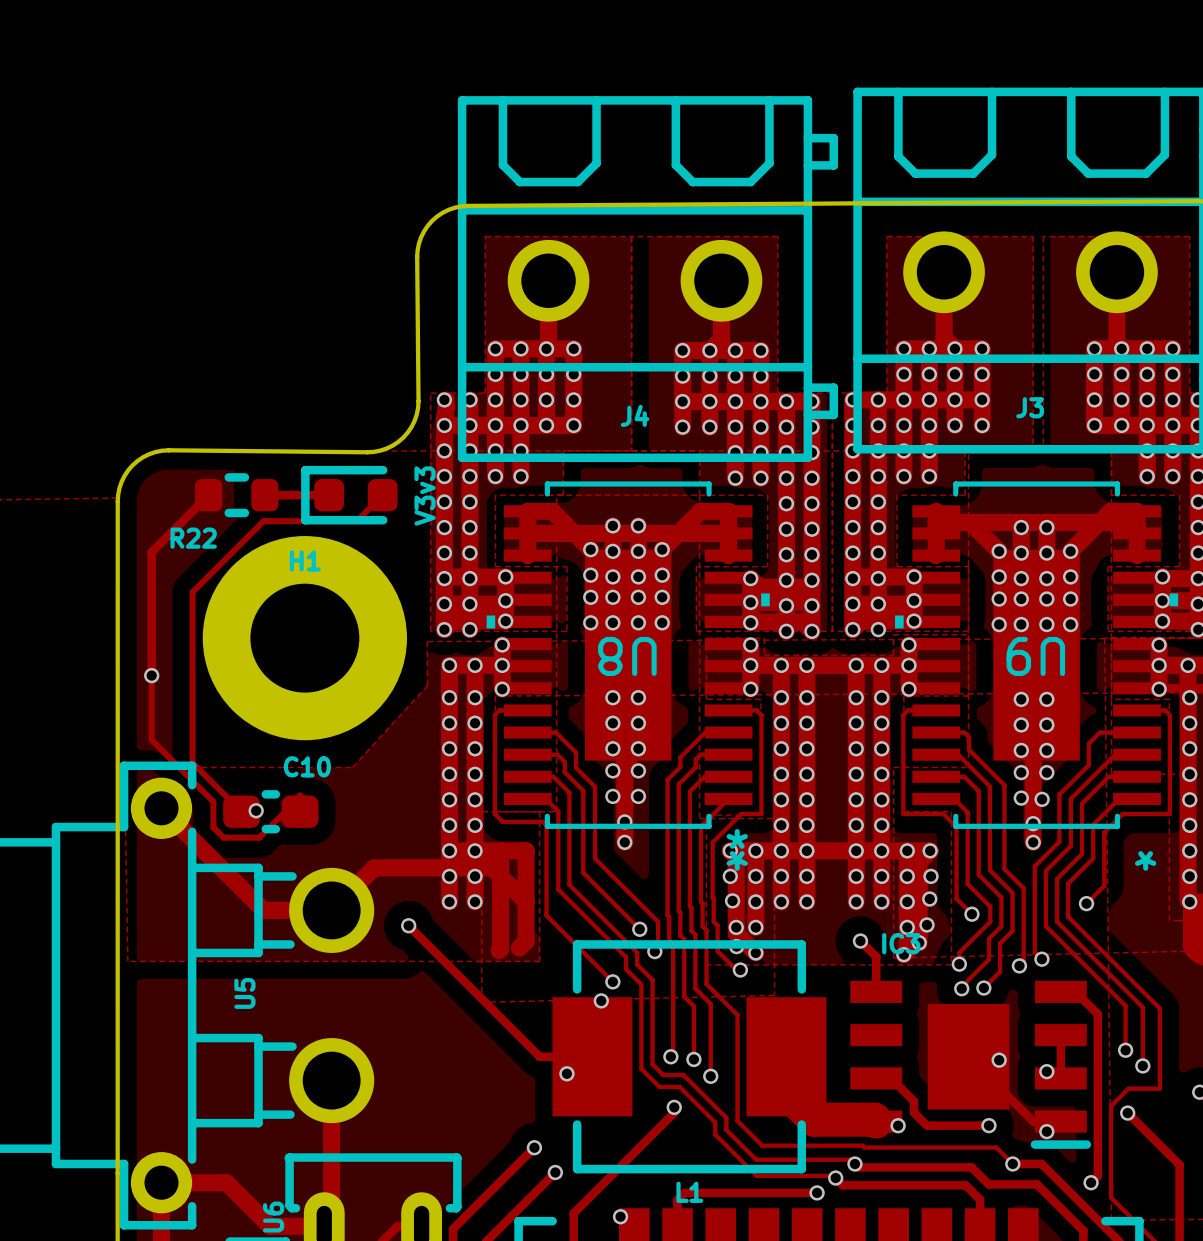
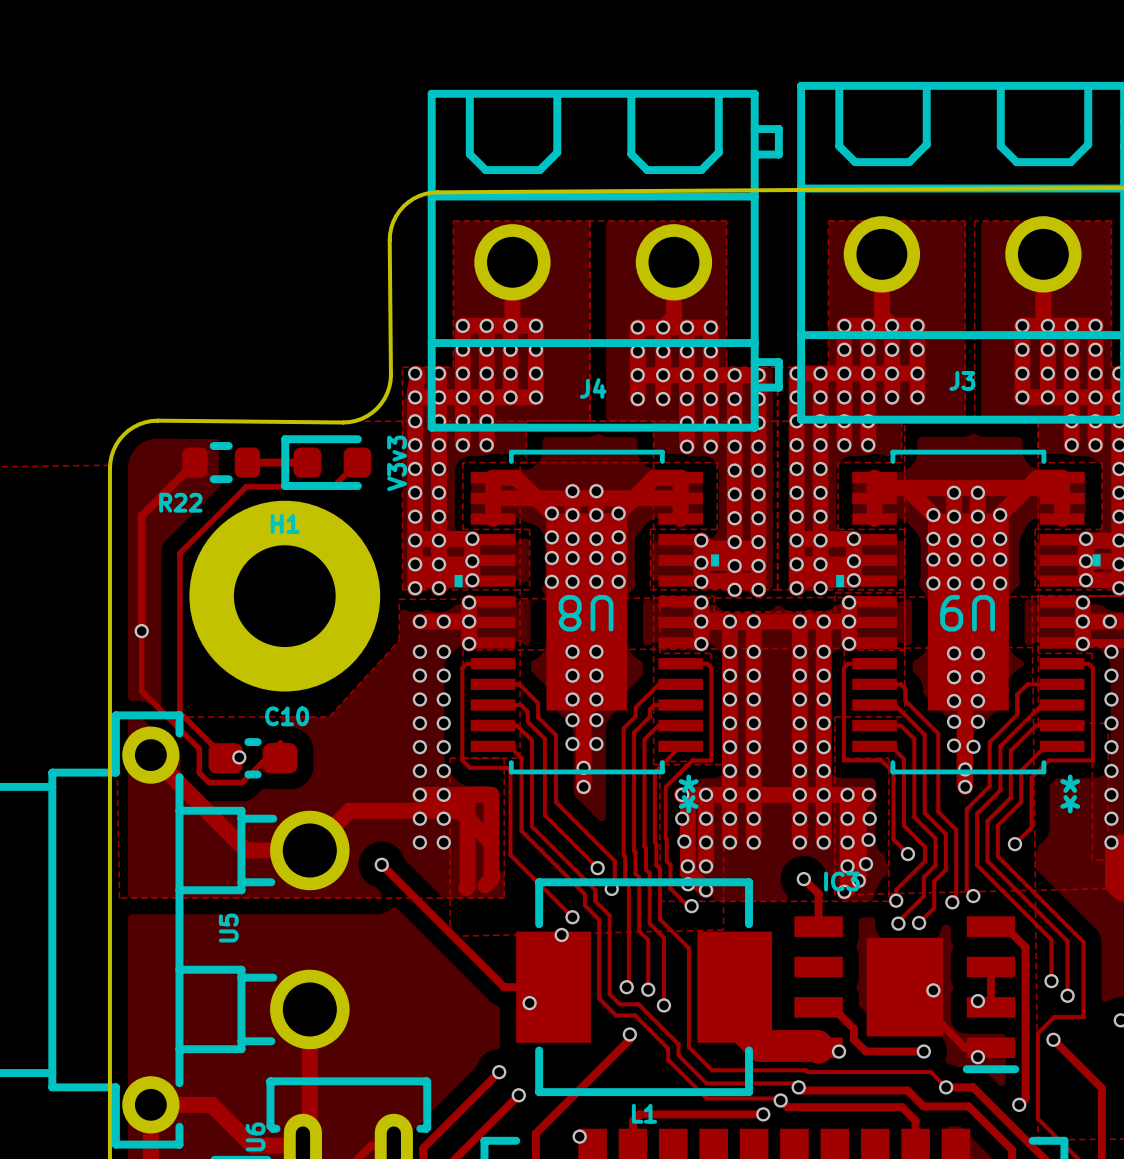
track: (449, 665) (449, 901) -> none
track: (475, 665) (475, 901) -> none
track: (1188, 665) (1188, 900) (1189, 901) -> none

